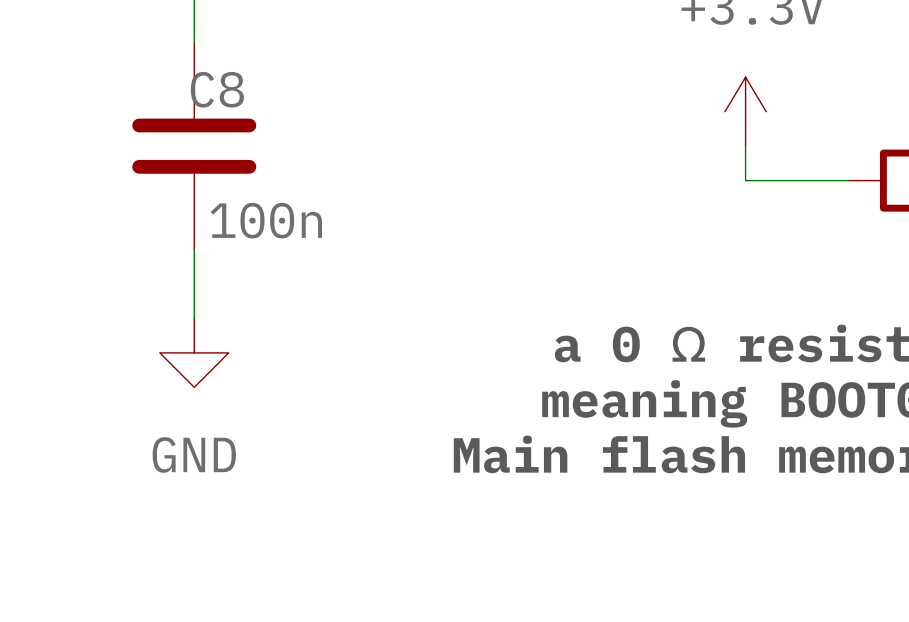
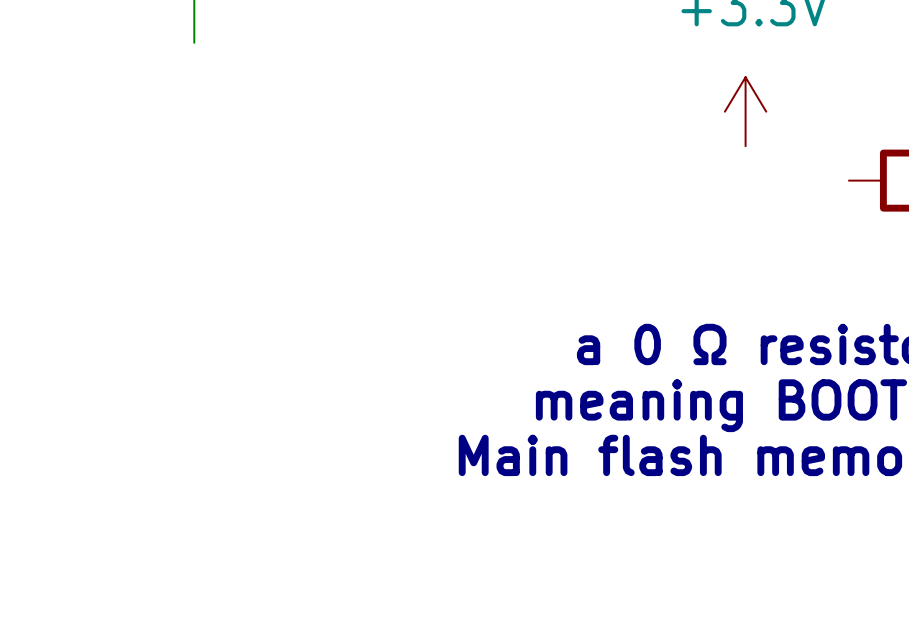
C8: 100n (194, 146) -> none
wire: (745, 146) (745, 180) (848, 180) -> none
wire: (194, 249) (194, 318) -> none
power symbol: GND (194, 352) -> none

